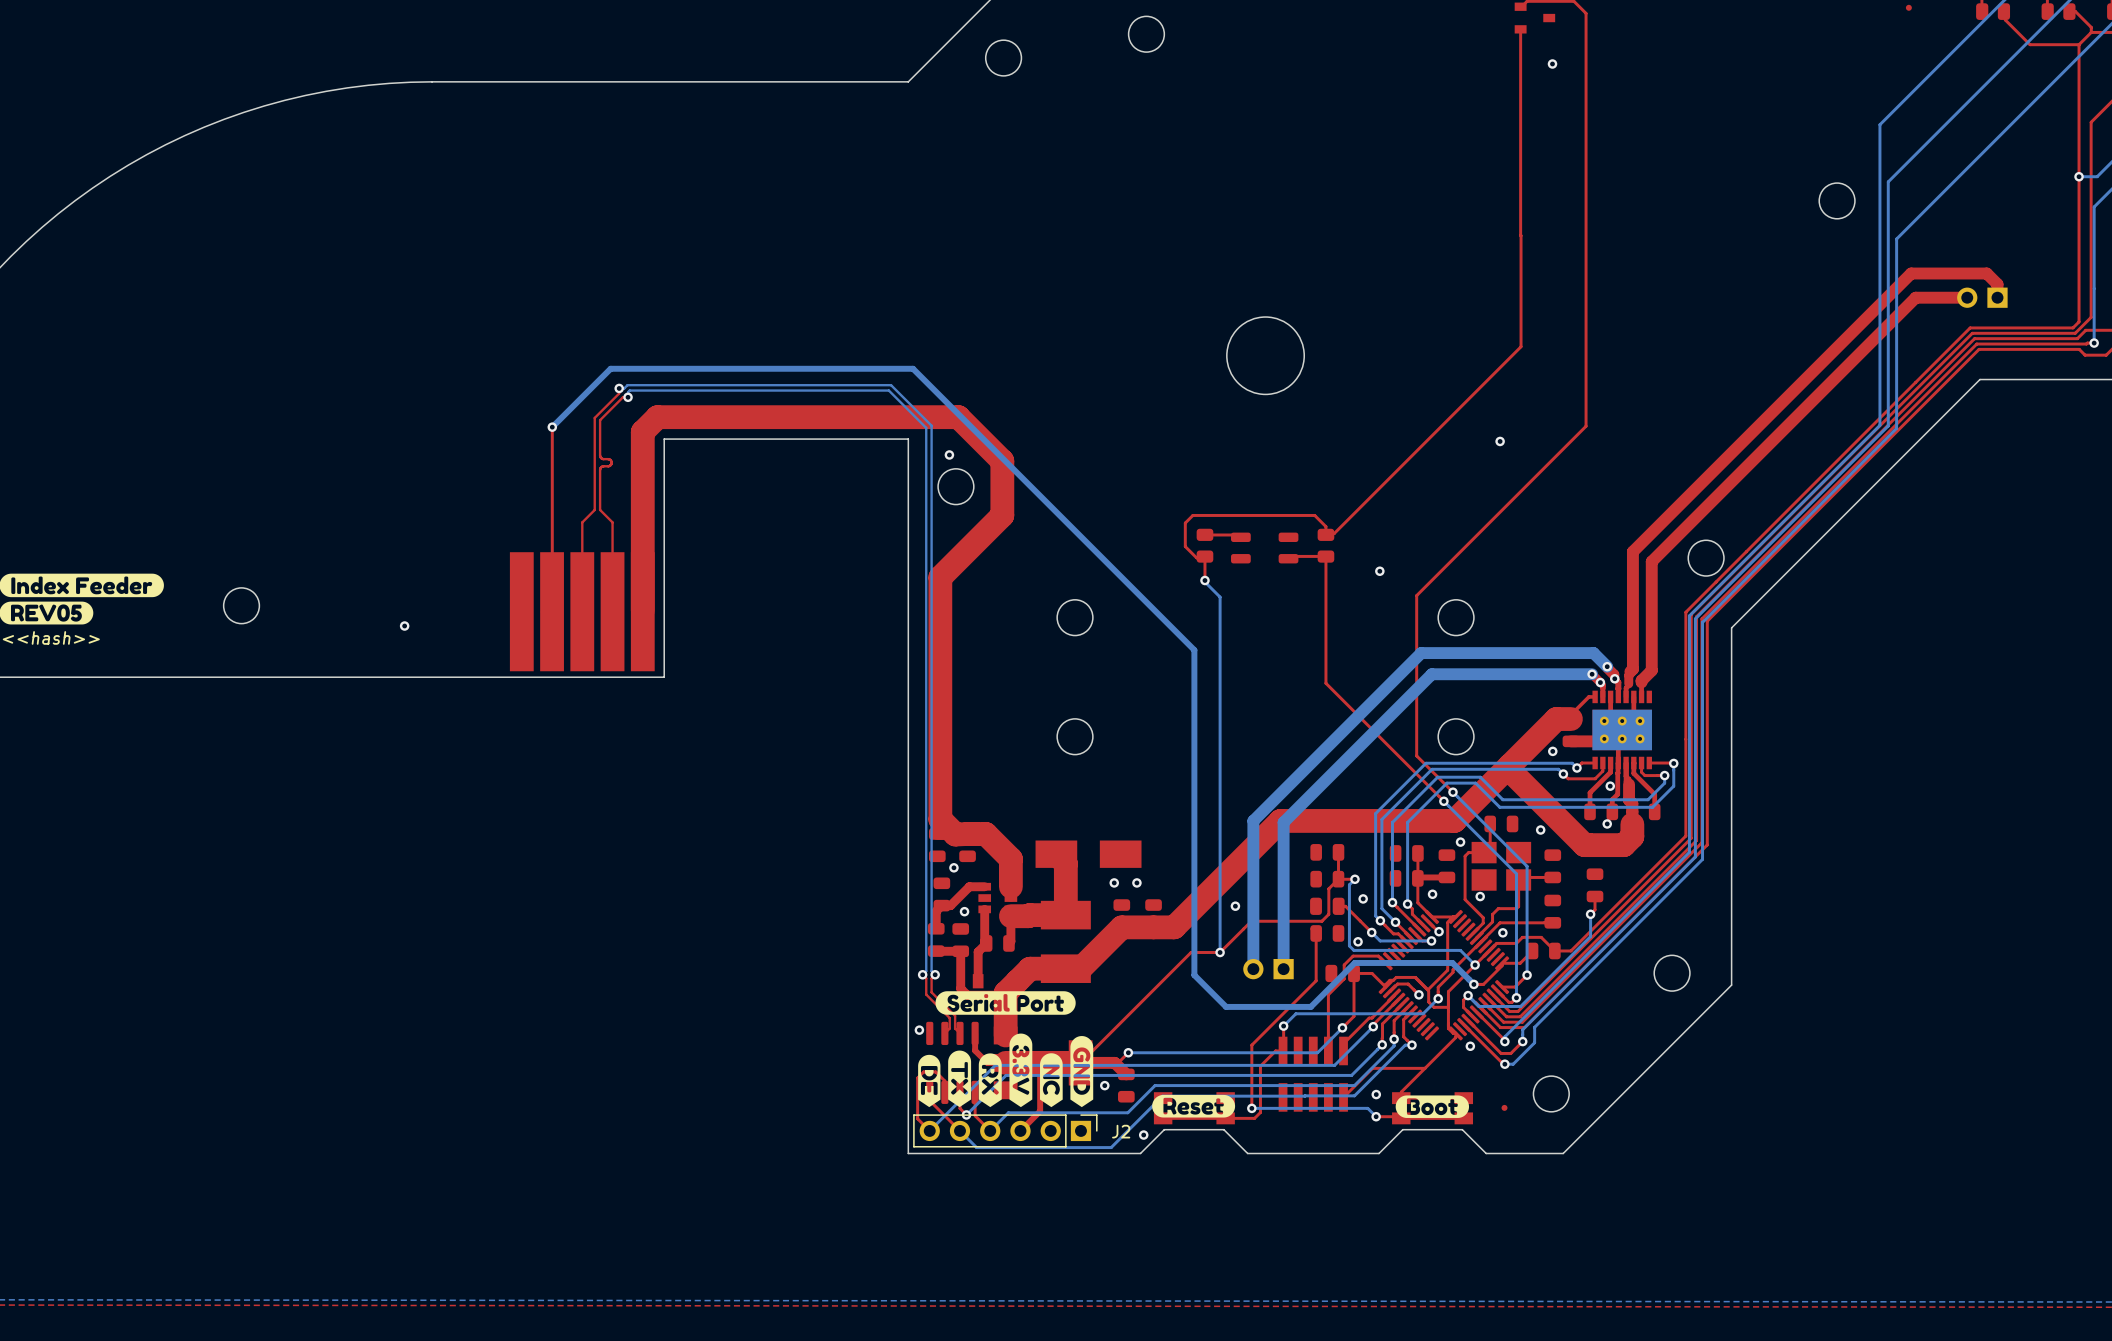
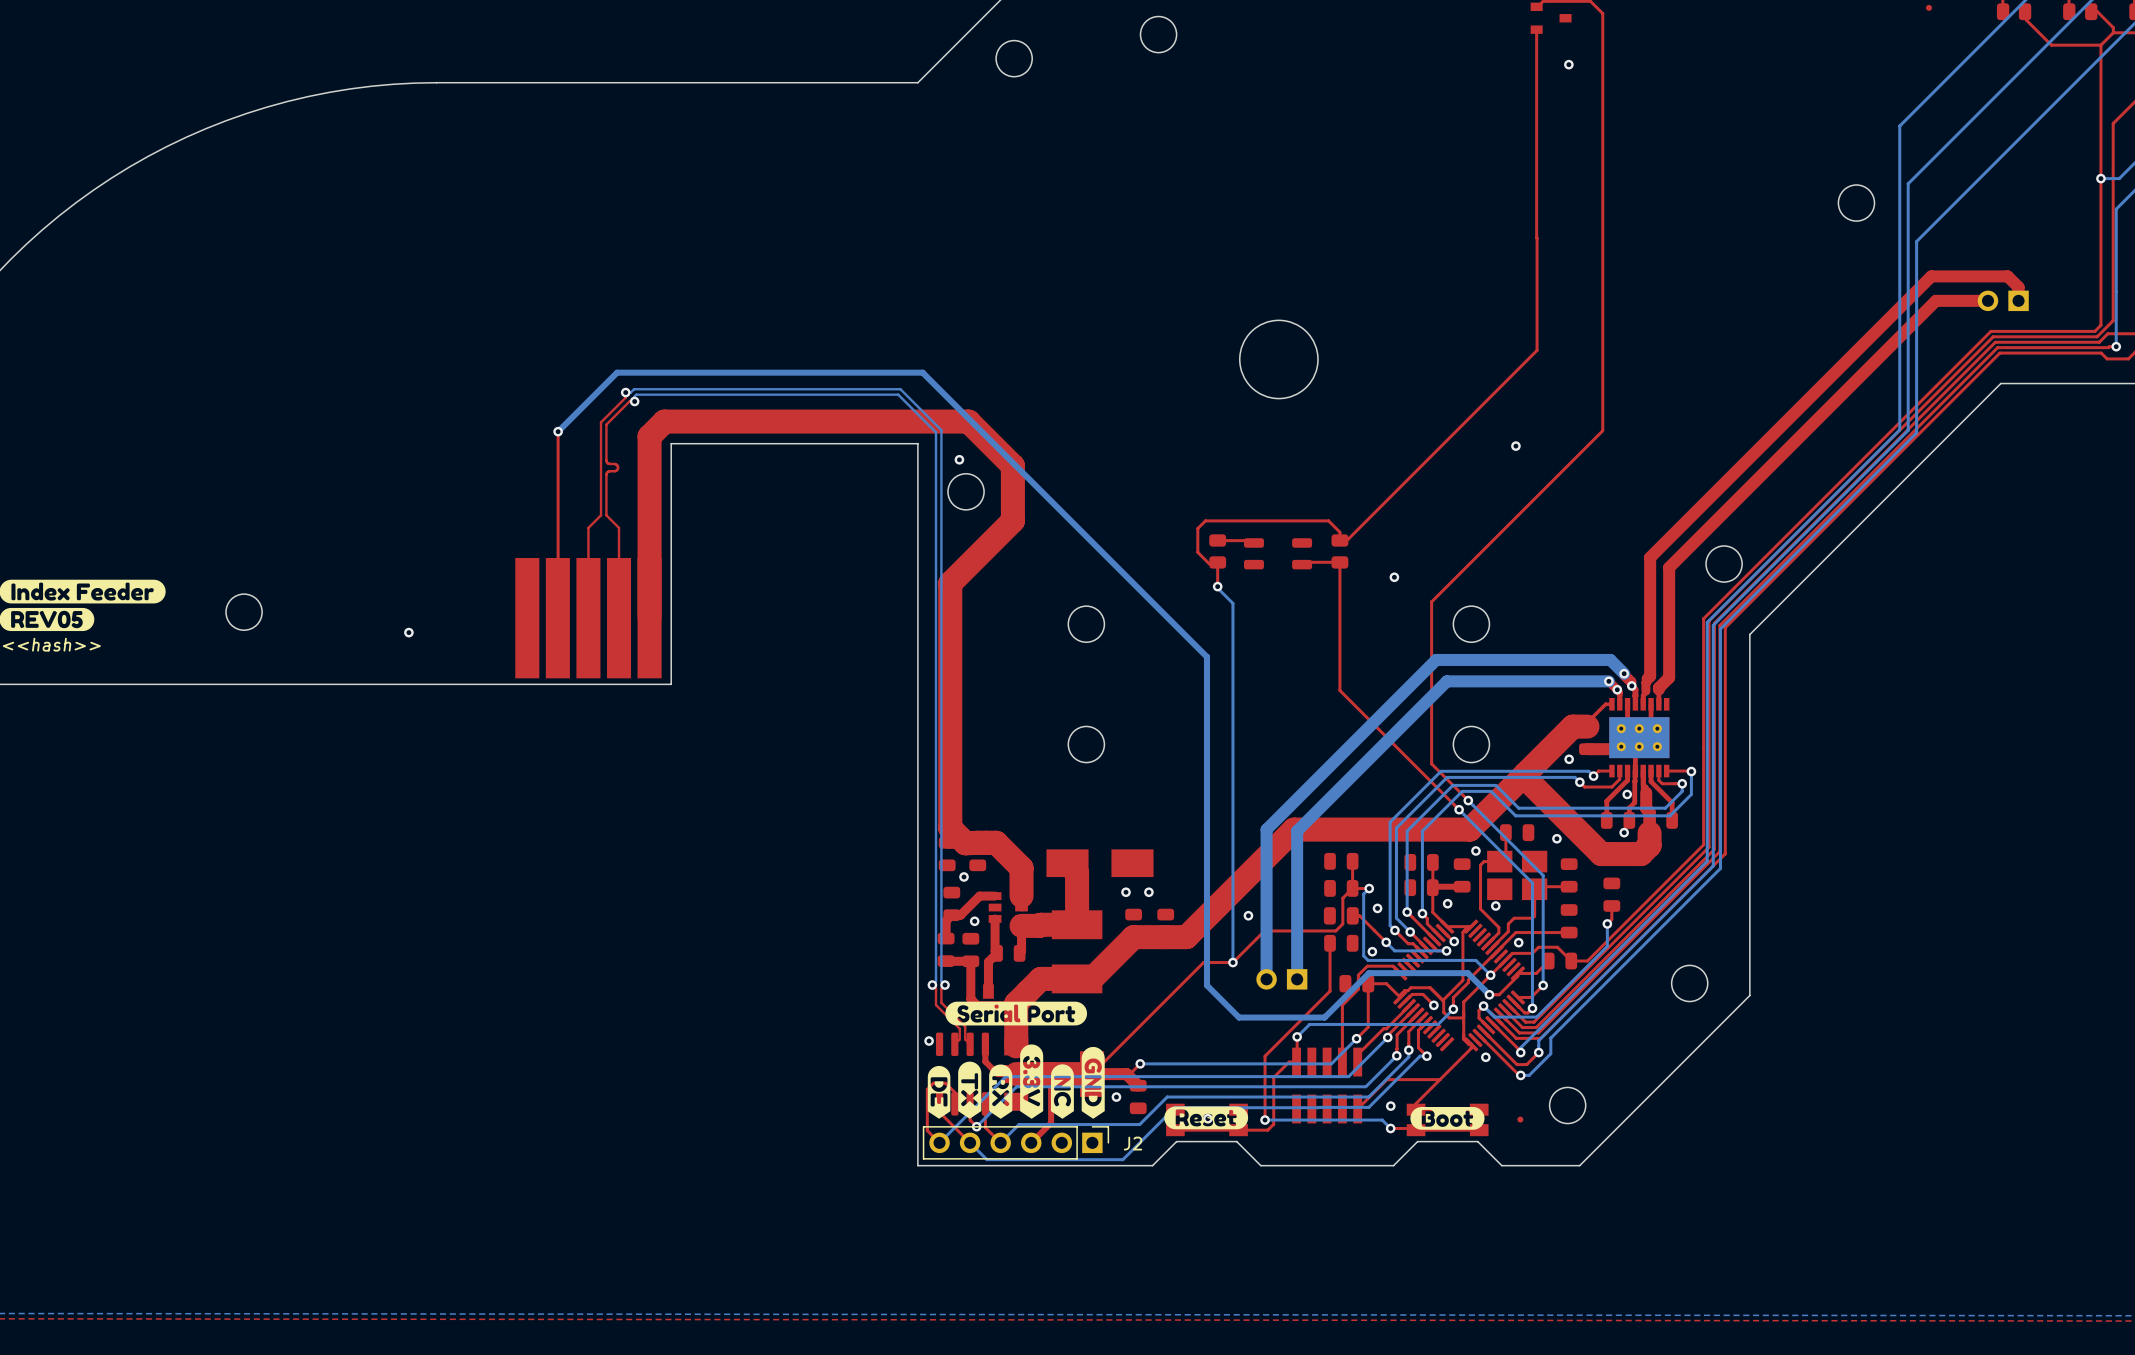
via position: (1143, 1135) -> (1207, 1118)

